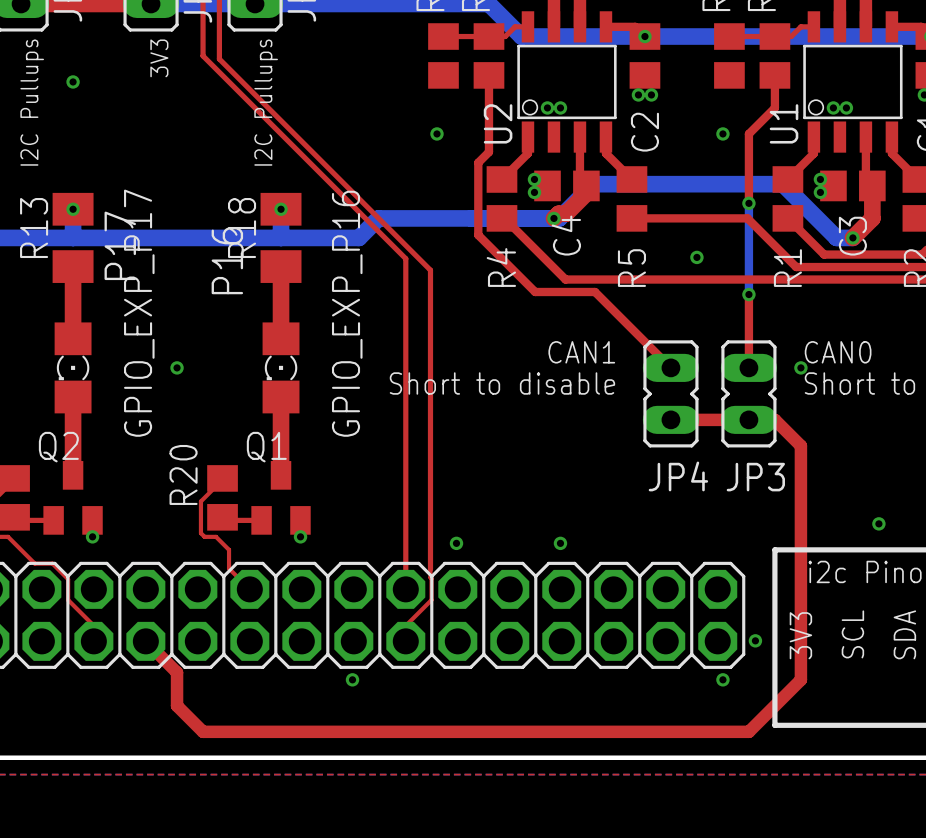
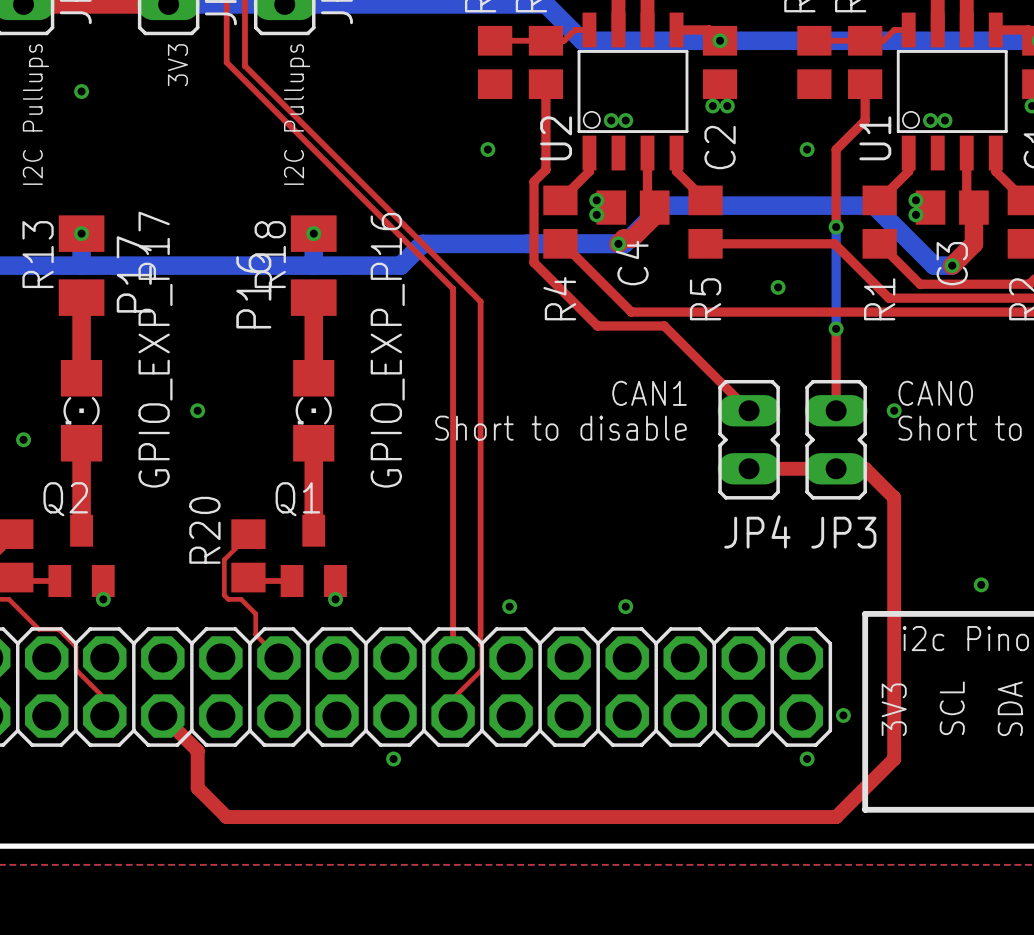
via: none -> (23, 439)

